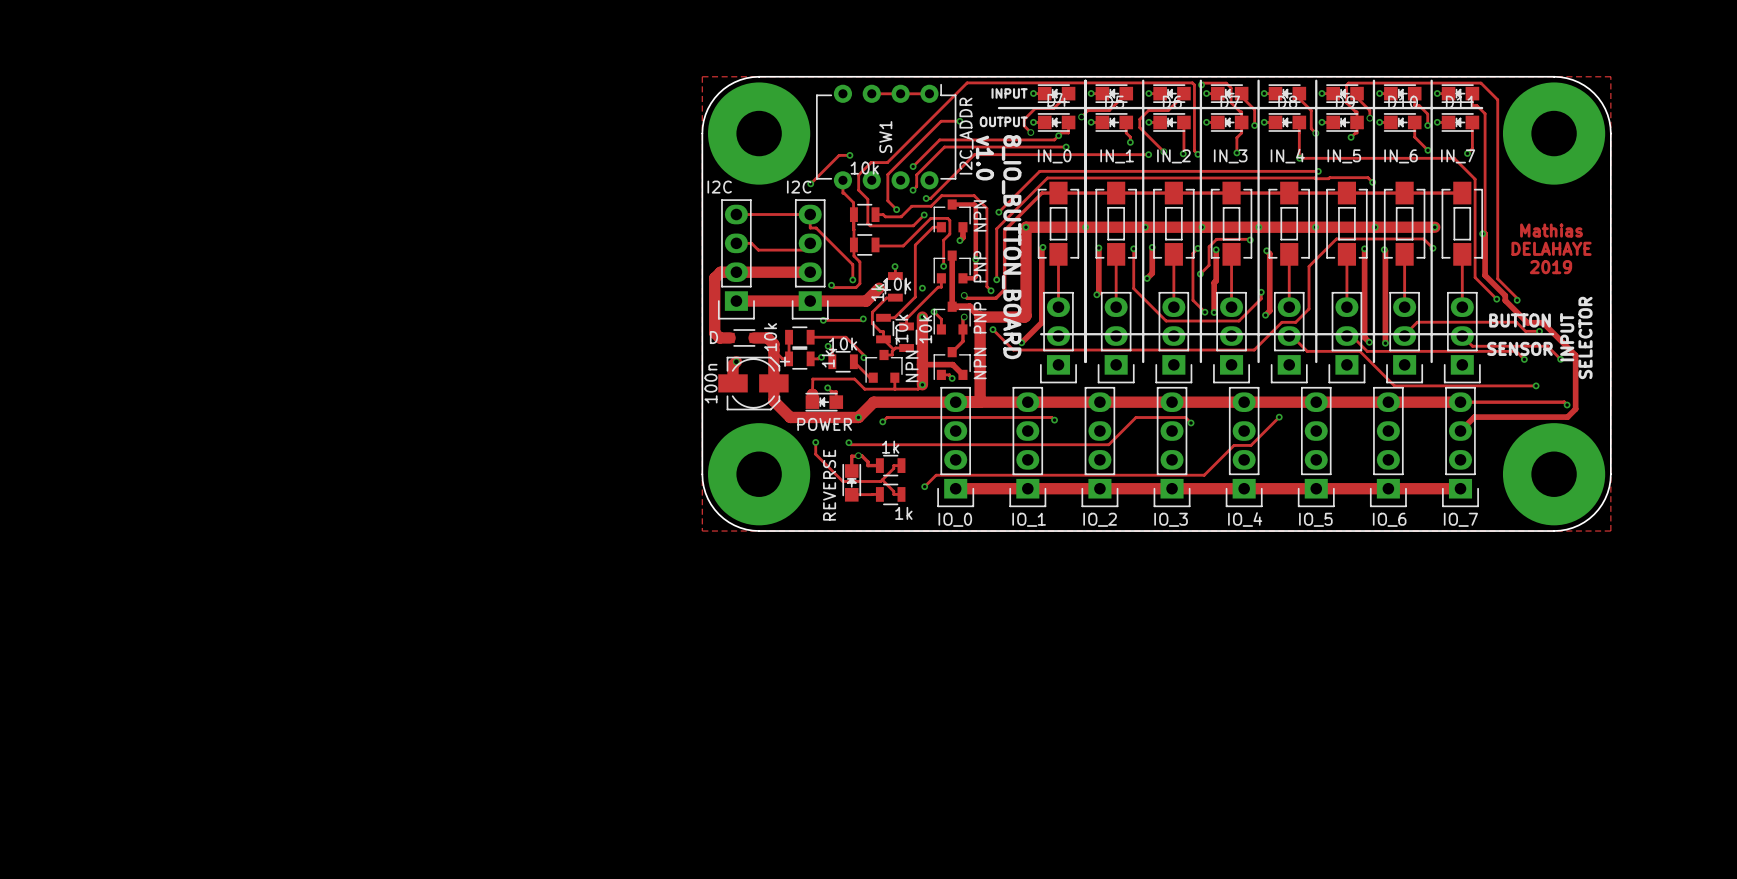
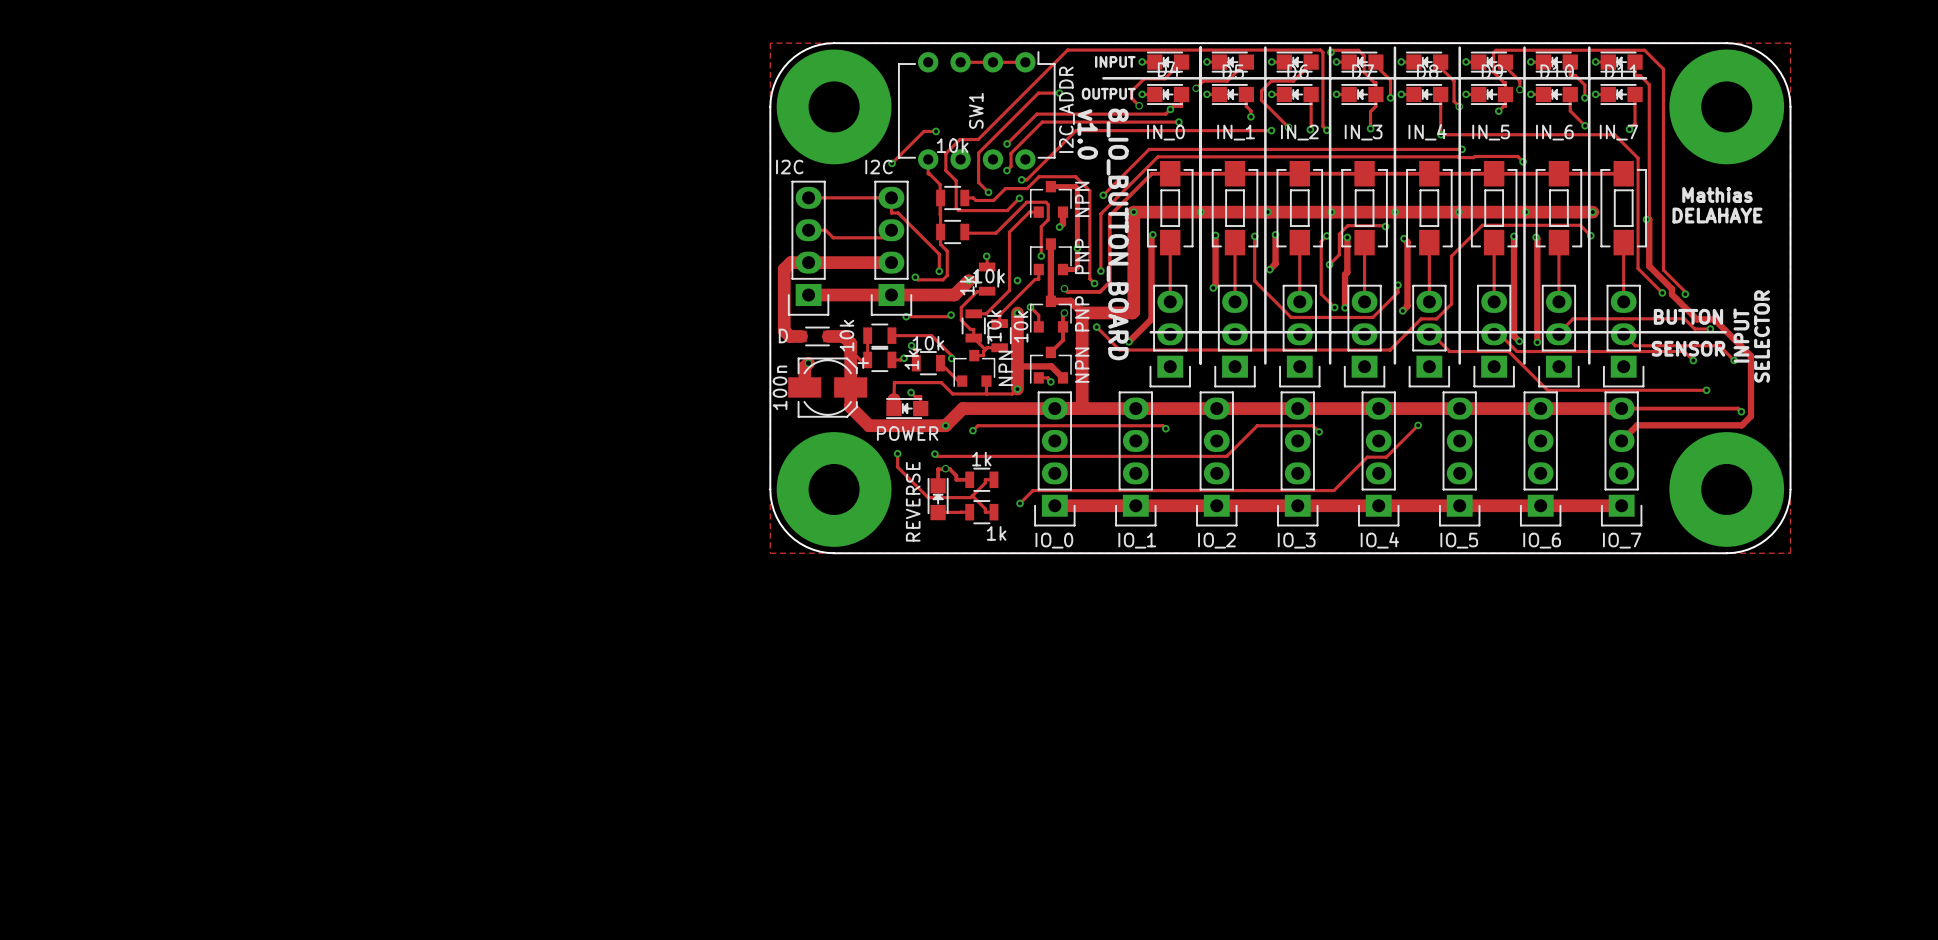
text: none -> Mathias (1717, 195)
text: Mathias (1551, 230) -> DELAHAYE (1717, 215)
text: DELAHAYE (1551, 248) -> none
text: 2019 (1550, 267) -> none

